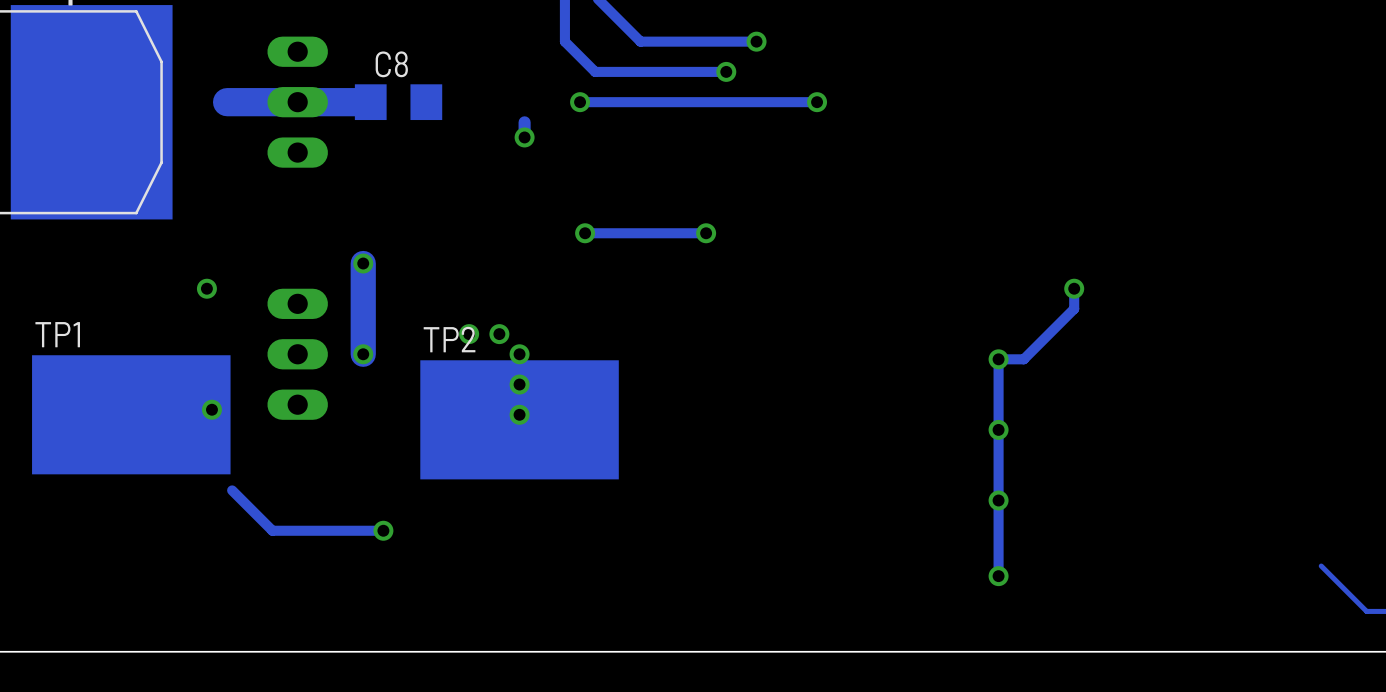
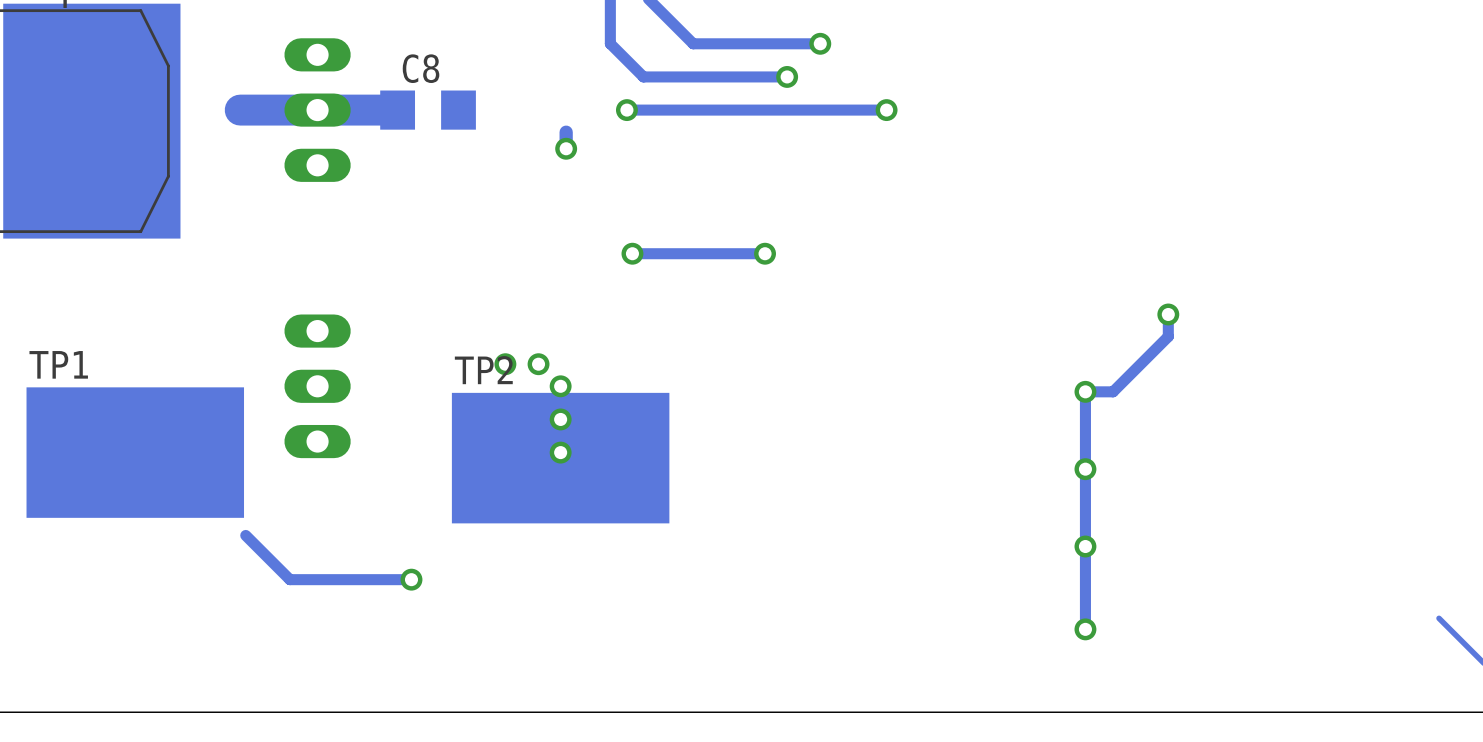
track: (363, 263) (363, 354) -> none
via: (363, 263) -> none
via: (206, 288) -> none
via: (363, 354) -> none
via: (211, 409) -> none

